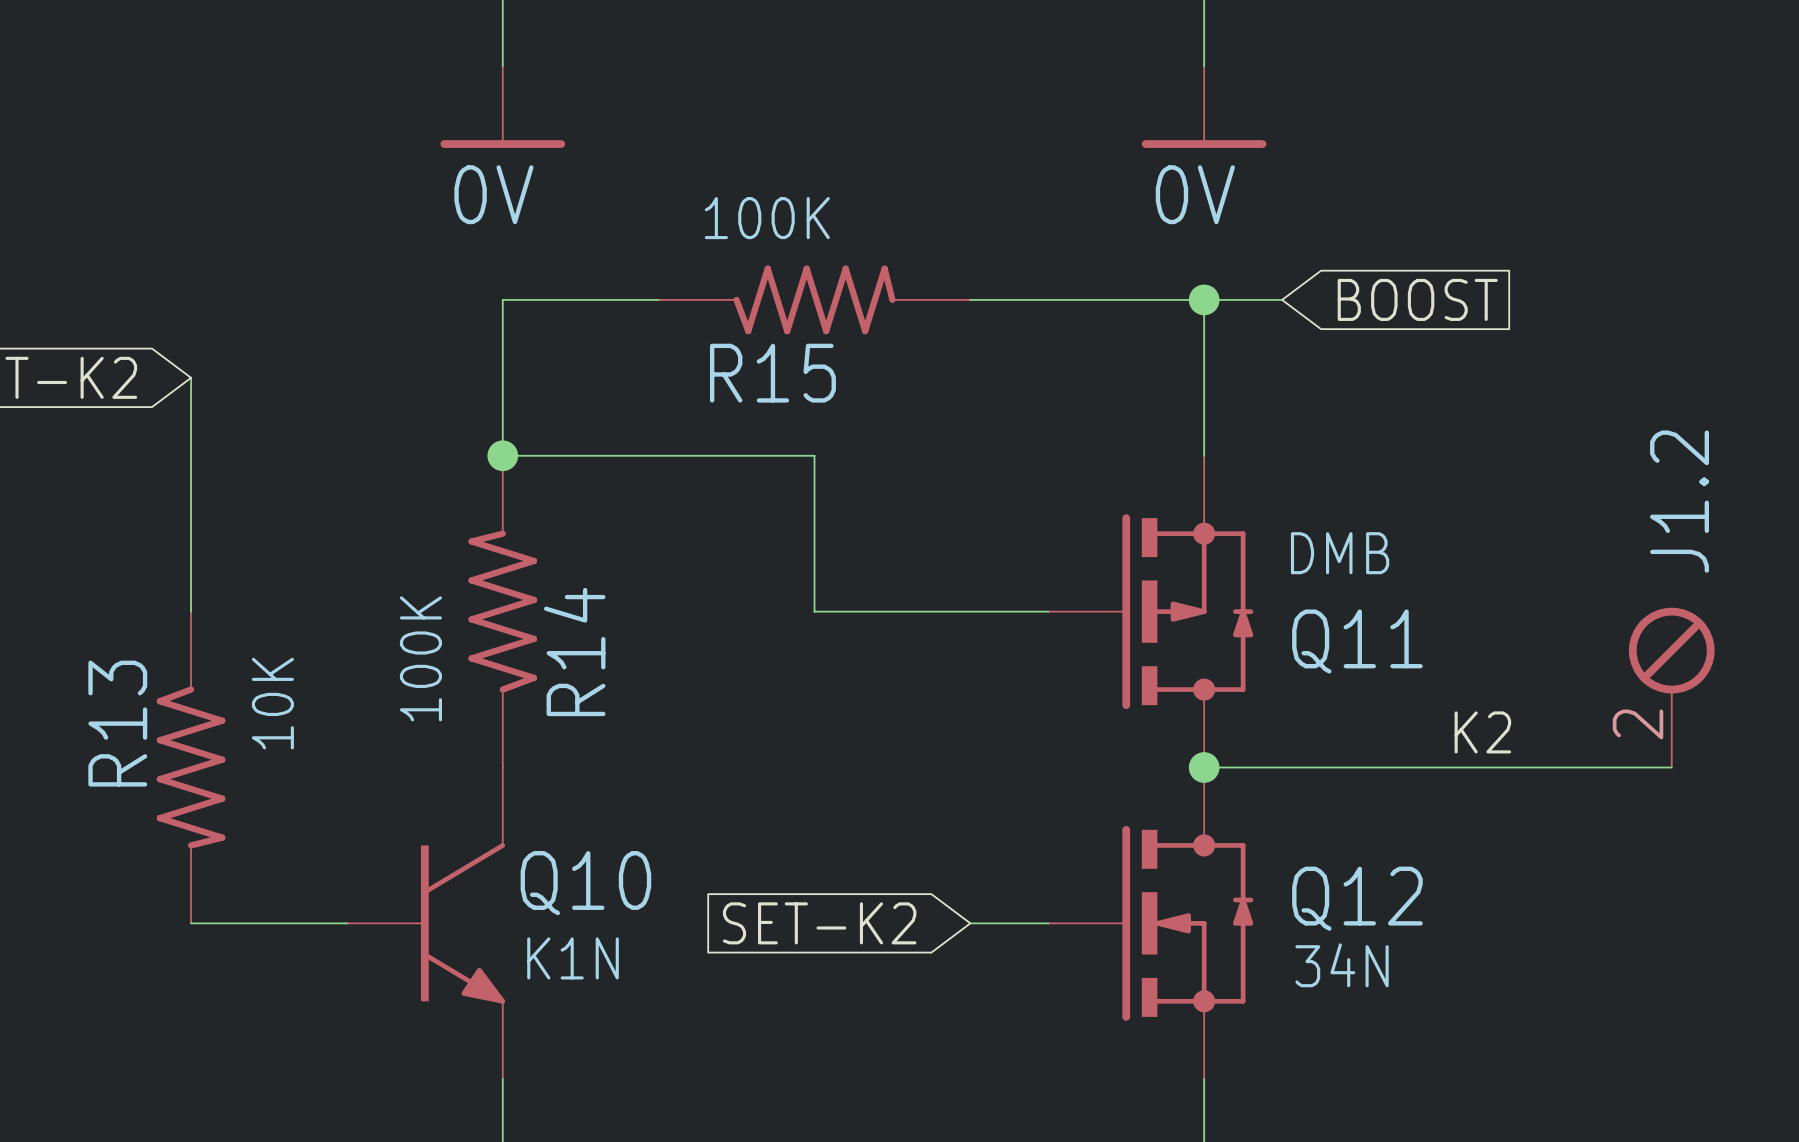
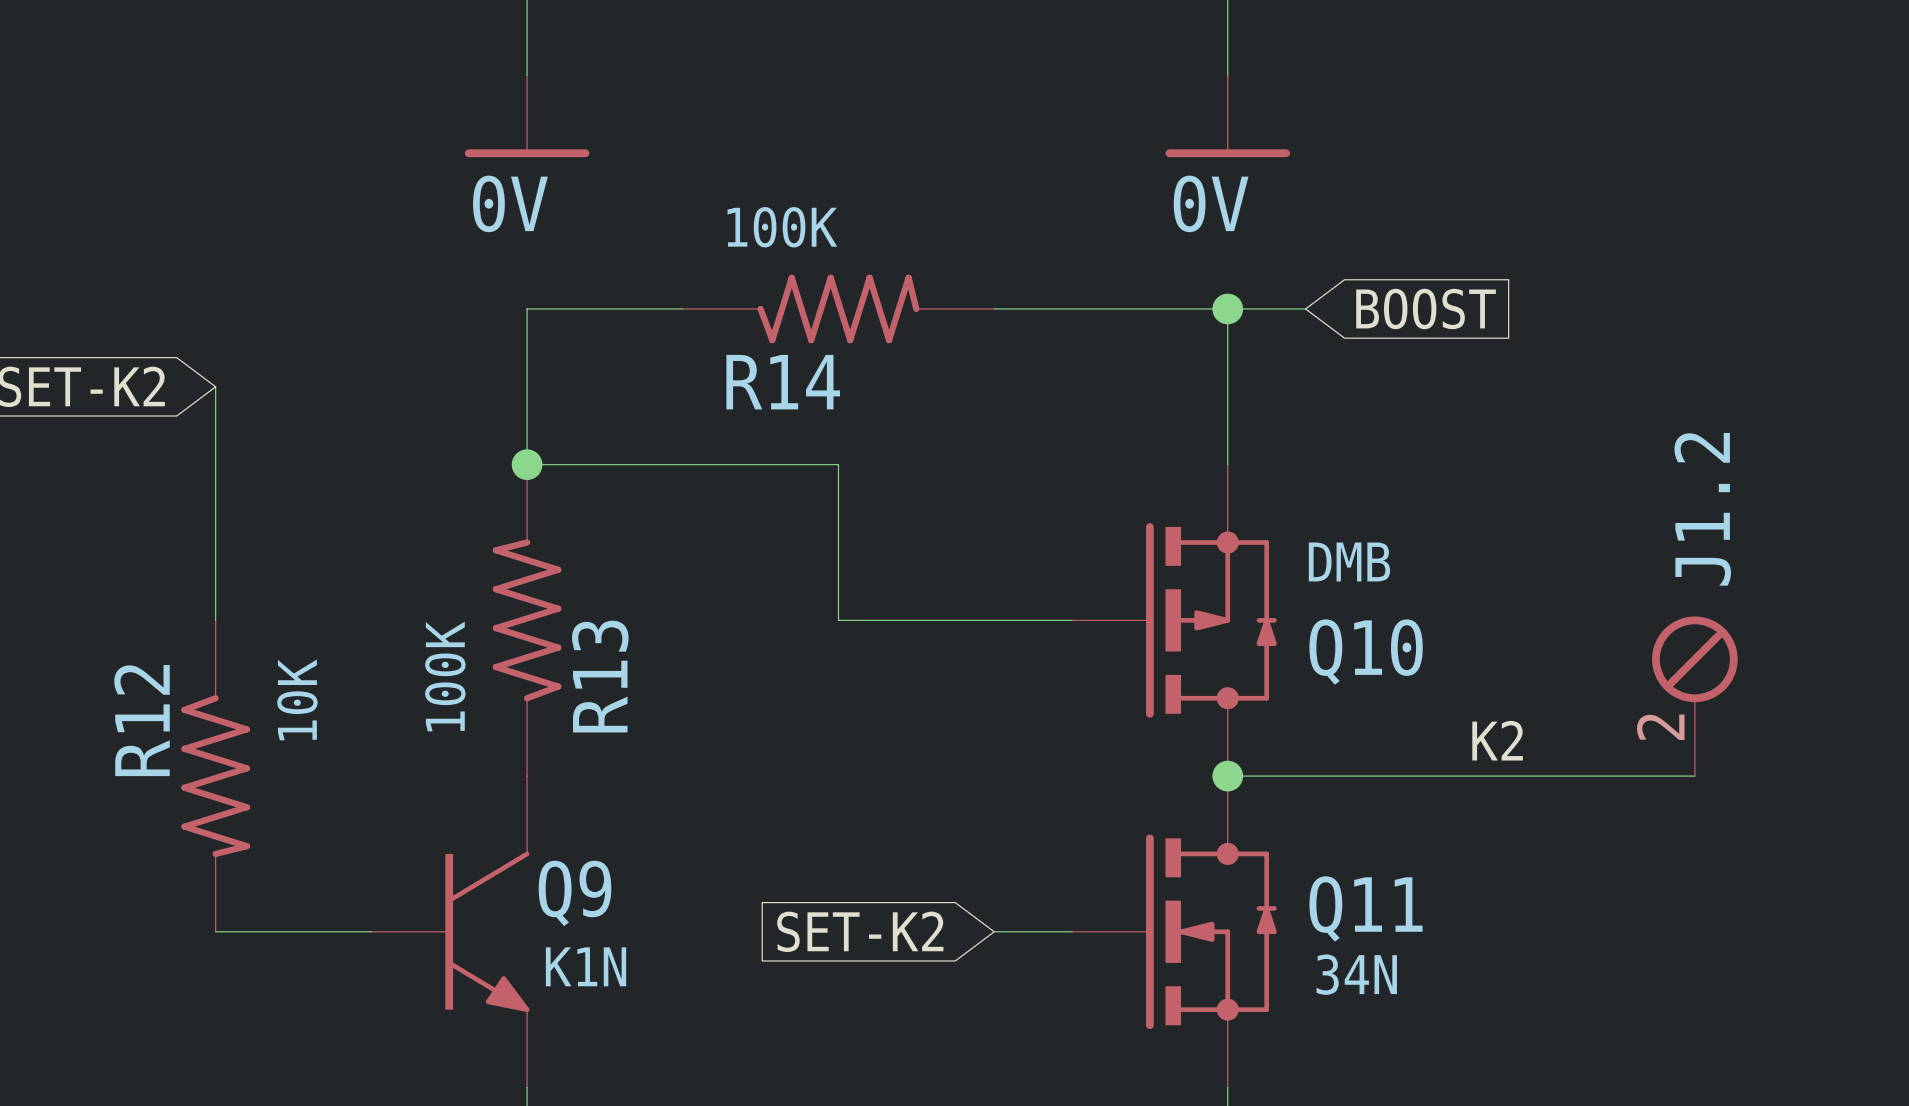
R15 name: R15 (772, 373) -> R14 (783, 382)
Q11 name: Q11 (1357, 641) -> Q10 (1366, 652)
R14 name: R14 (574, 652) -> R13 (600, 676)
R13 name: R13 (117, 723) -> R12 (141, 720)
Q10 name: Q10 (585, 883) -> Q9 (575, 893)
Q12 name: Q12 (1357, 898) -> Q11 (1366, 908)

